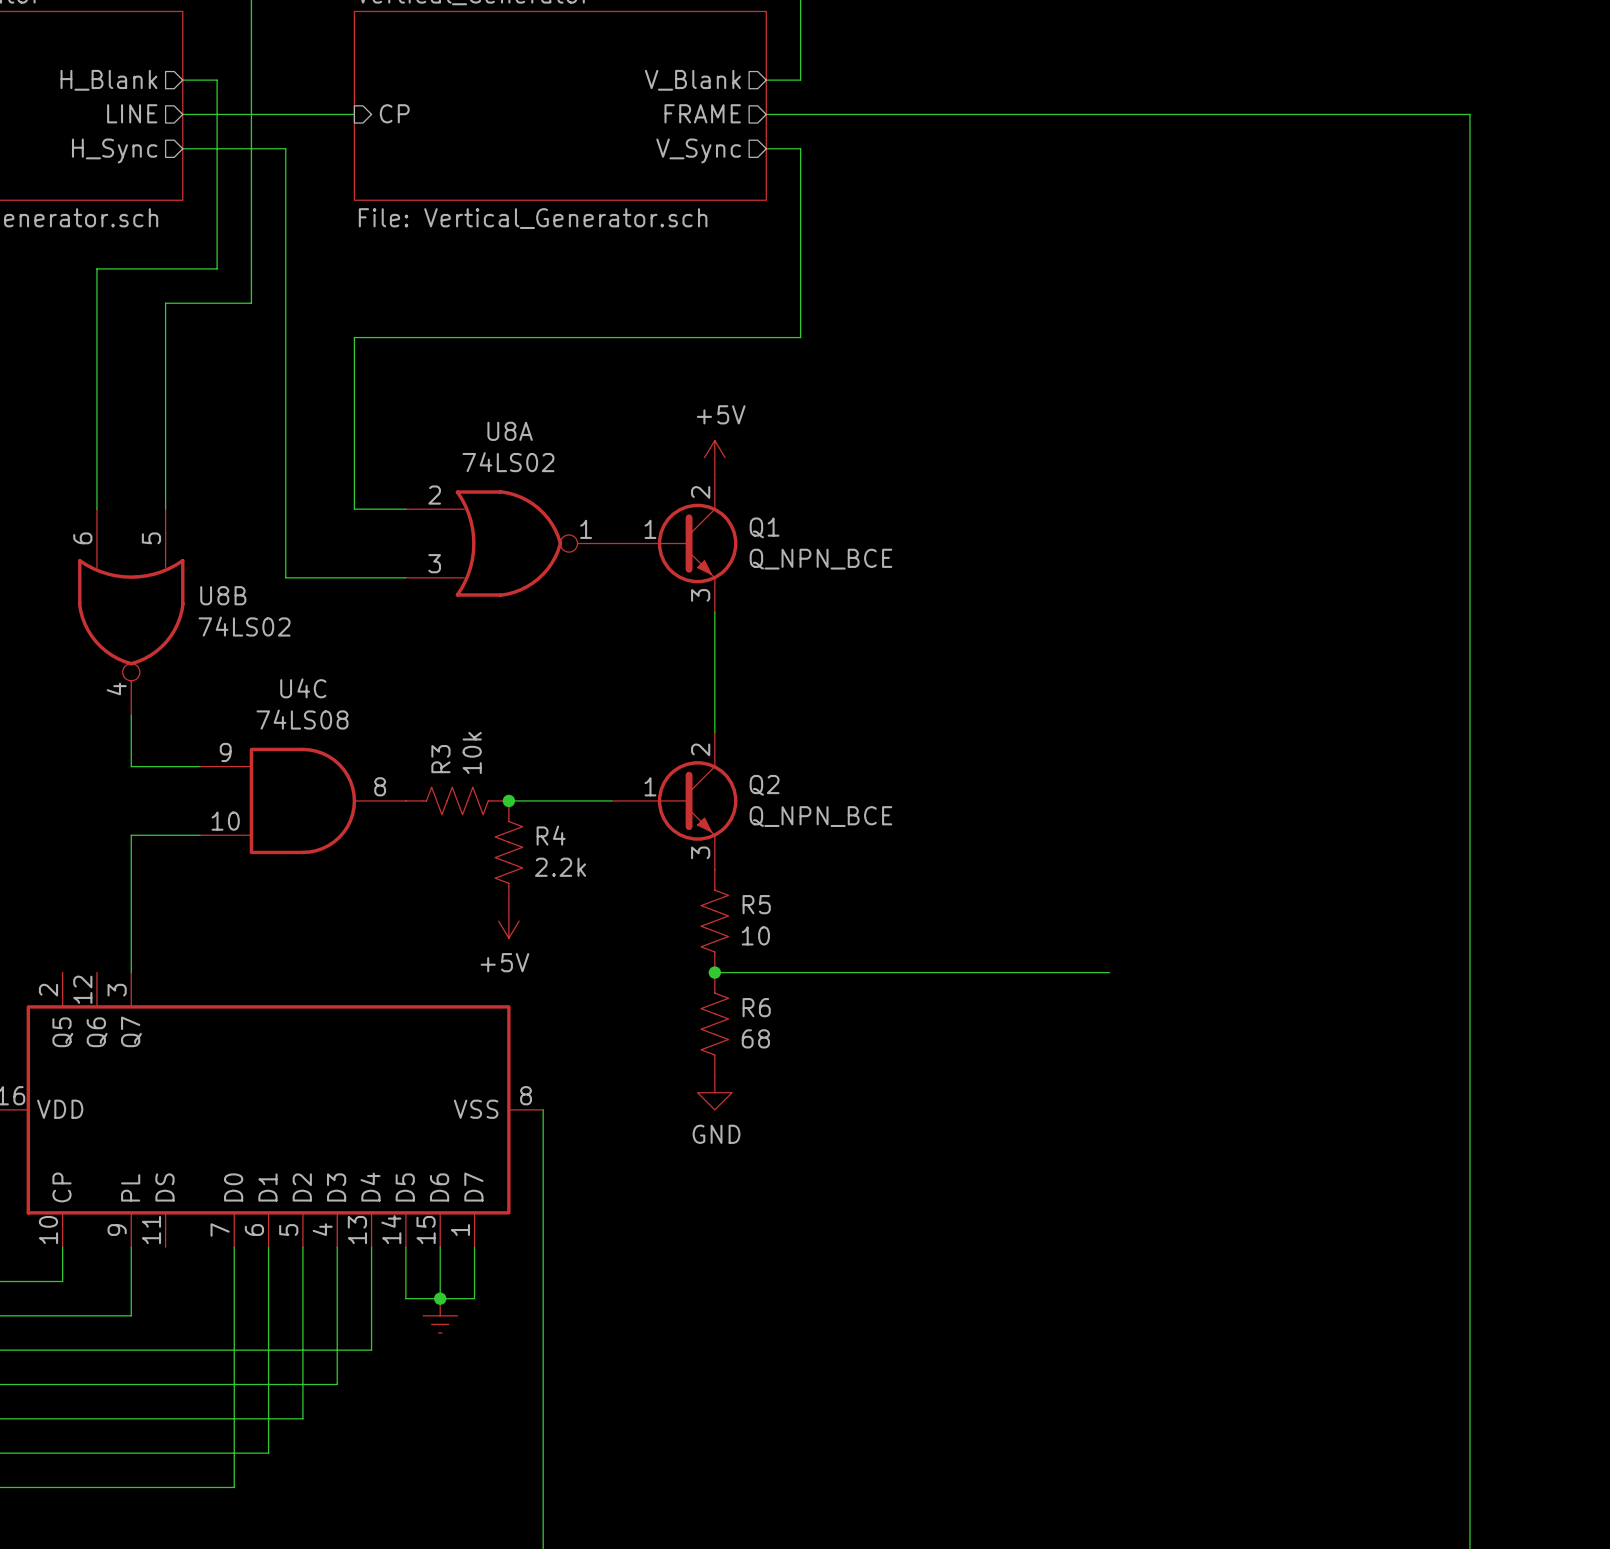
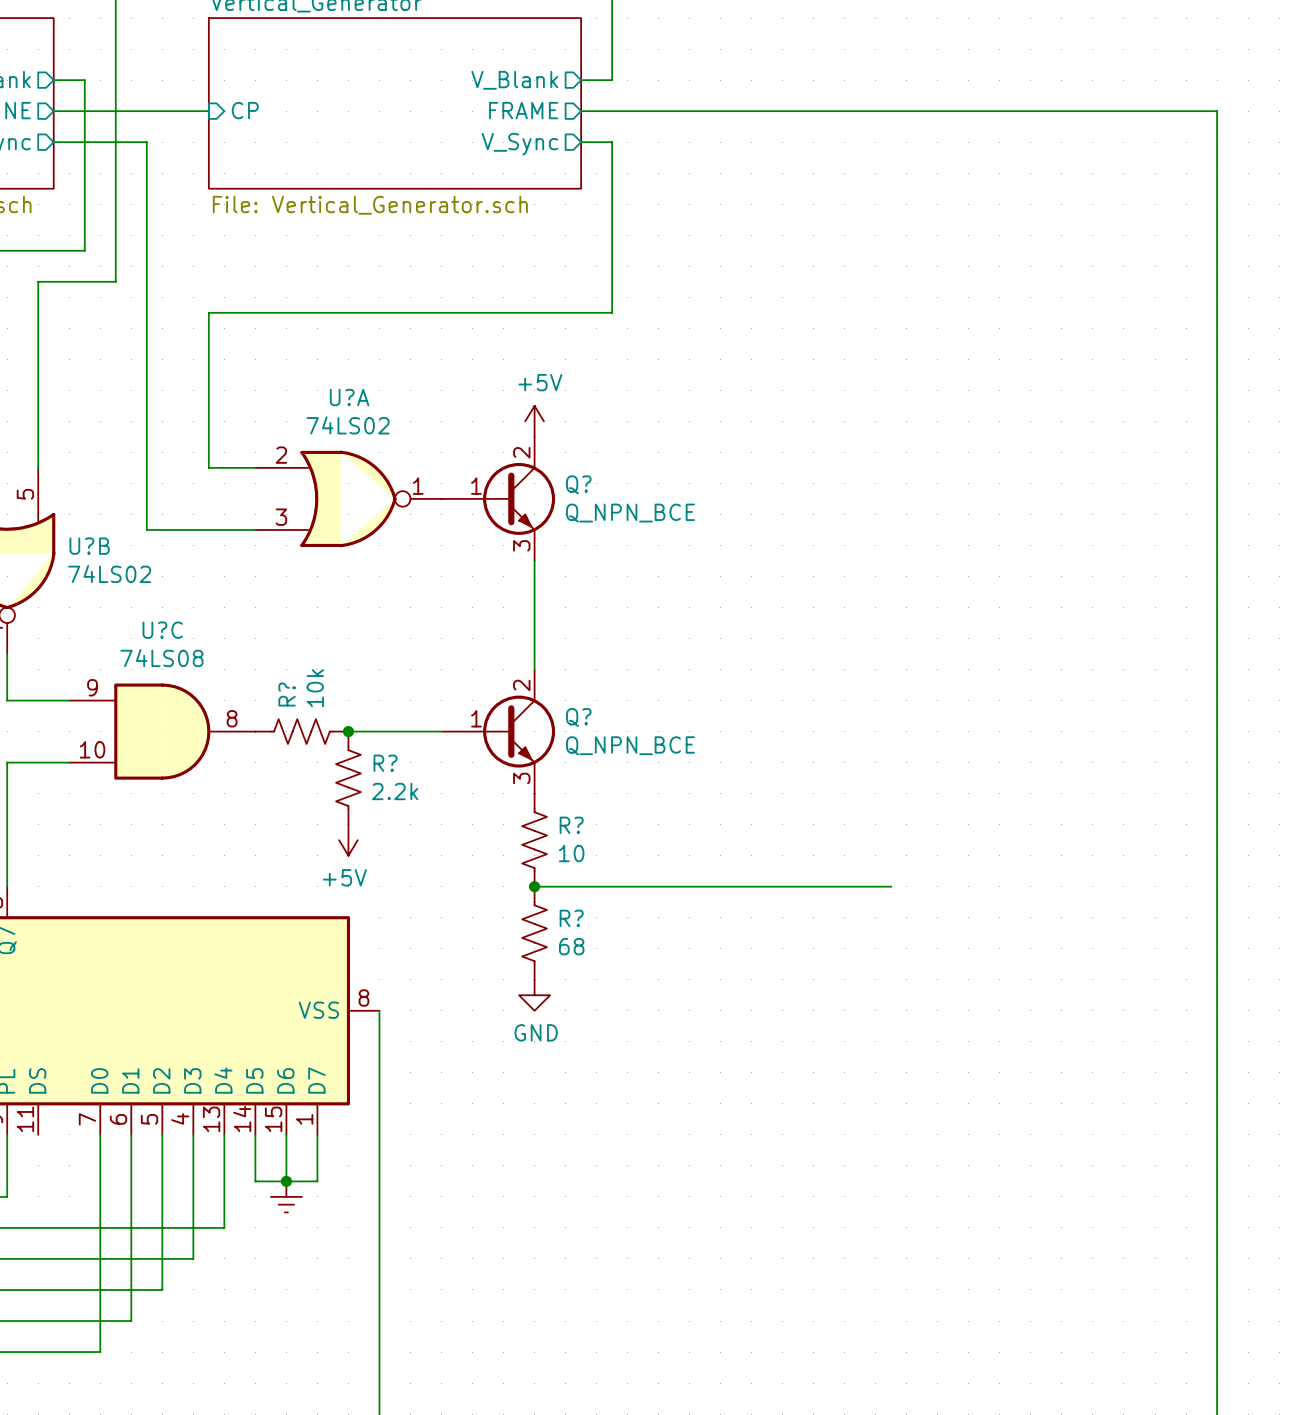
U8A name: U8A (510, 431) -> U?A (349, 397)
Q1 name: Q1 (764, 527) -> Q? (578, 484)
U8B name: U8B (223, 595) -> U?B (89, 546)
U4C name: U4C (303, 688) -> U?C (162, 630)
R3 name: R3 (440, 759) -> R? (287, 694)
Q2 name: Q2 (764, 785) -> Q? (578, 717)
R4 name: R4 (551, 835) -> R? (385, 763)
R5 name: R5 (756, 904) -> R? (571, 825)
R6 name: R6 (756, 1007) -> R? (571, 918)

